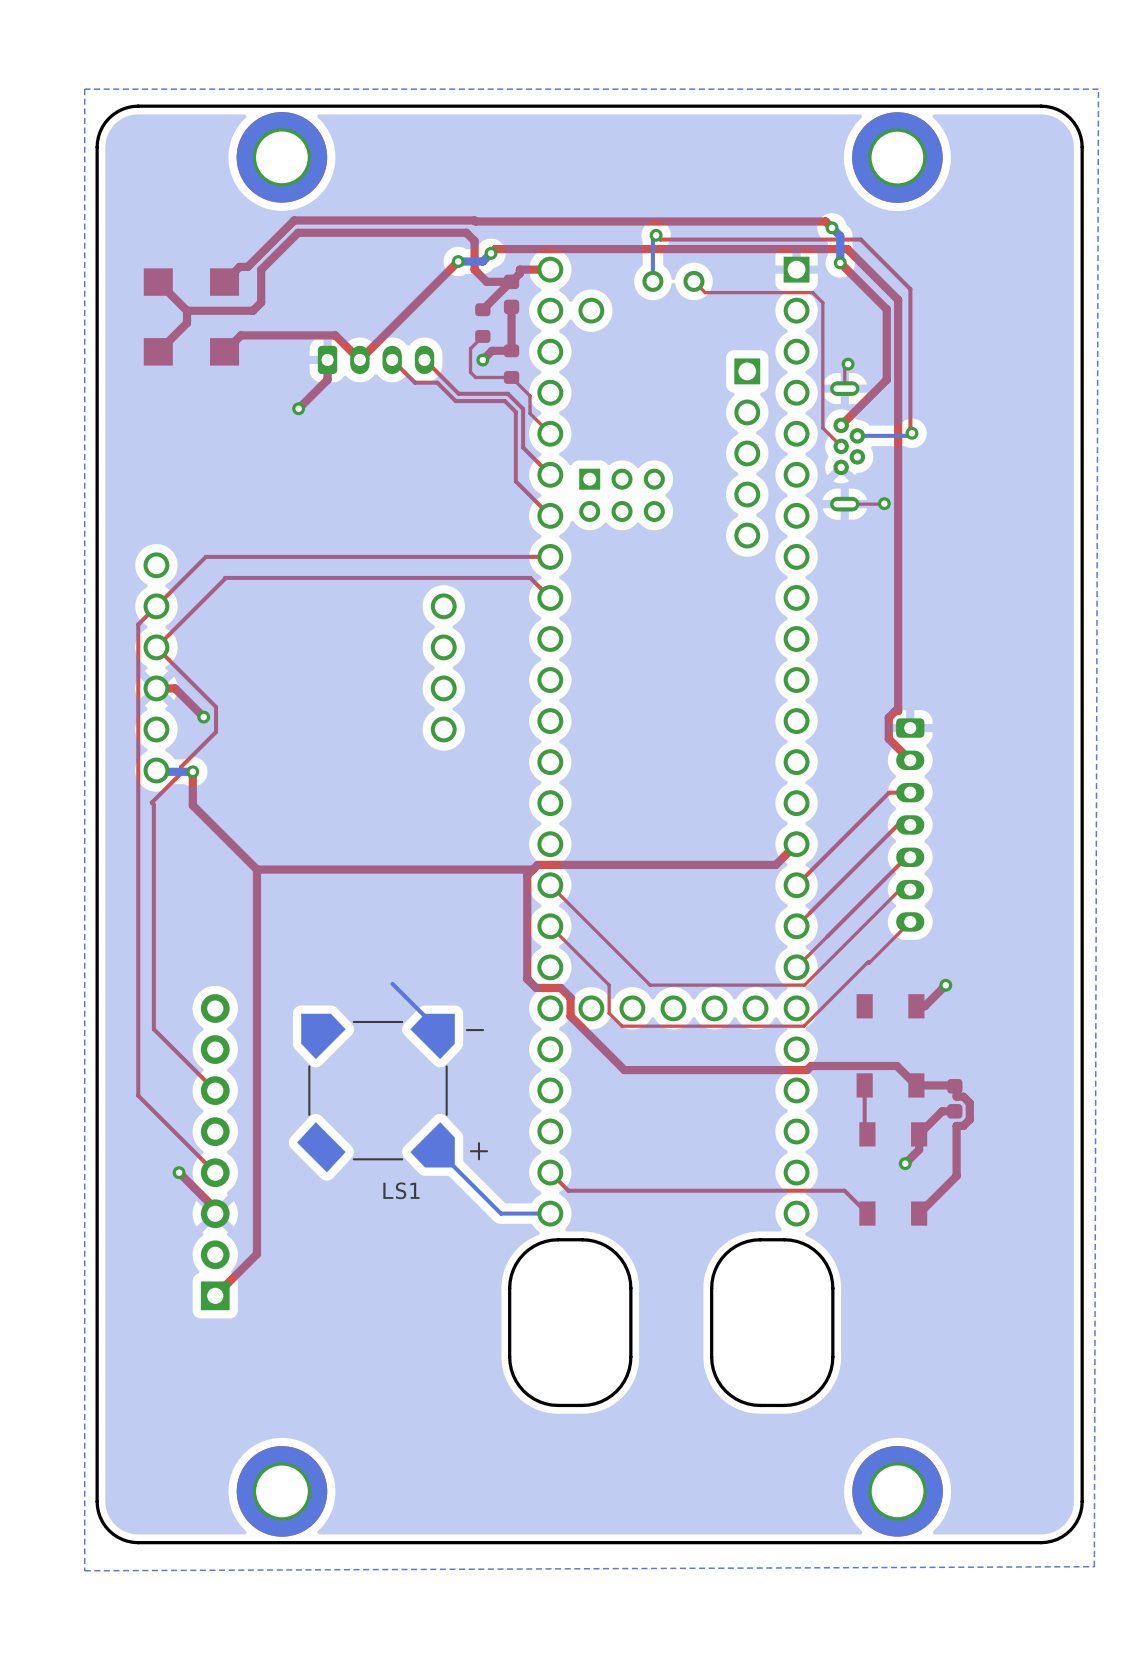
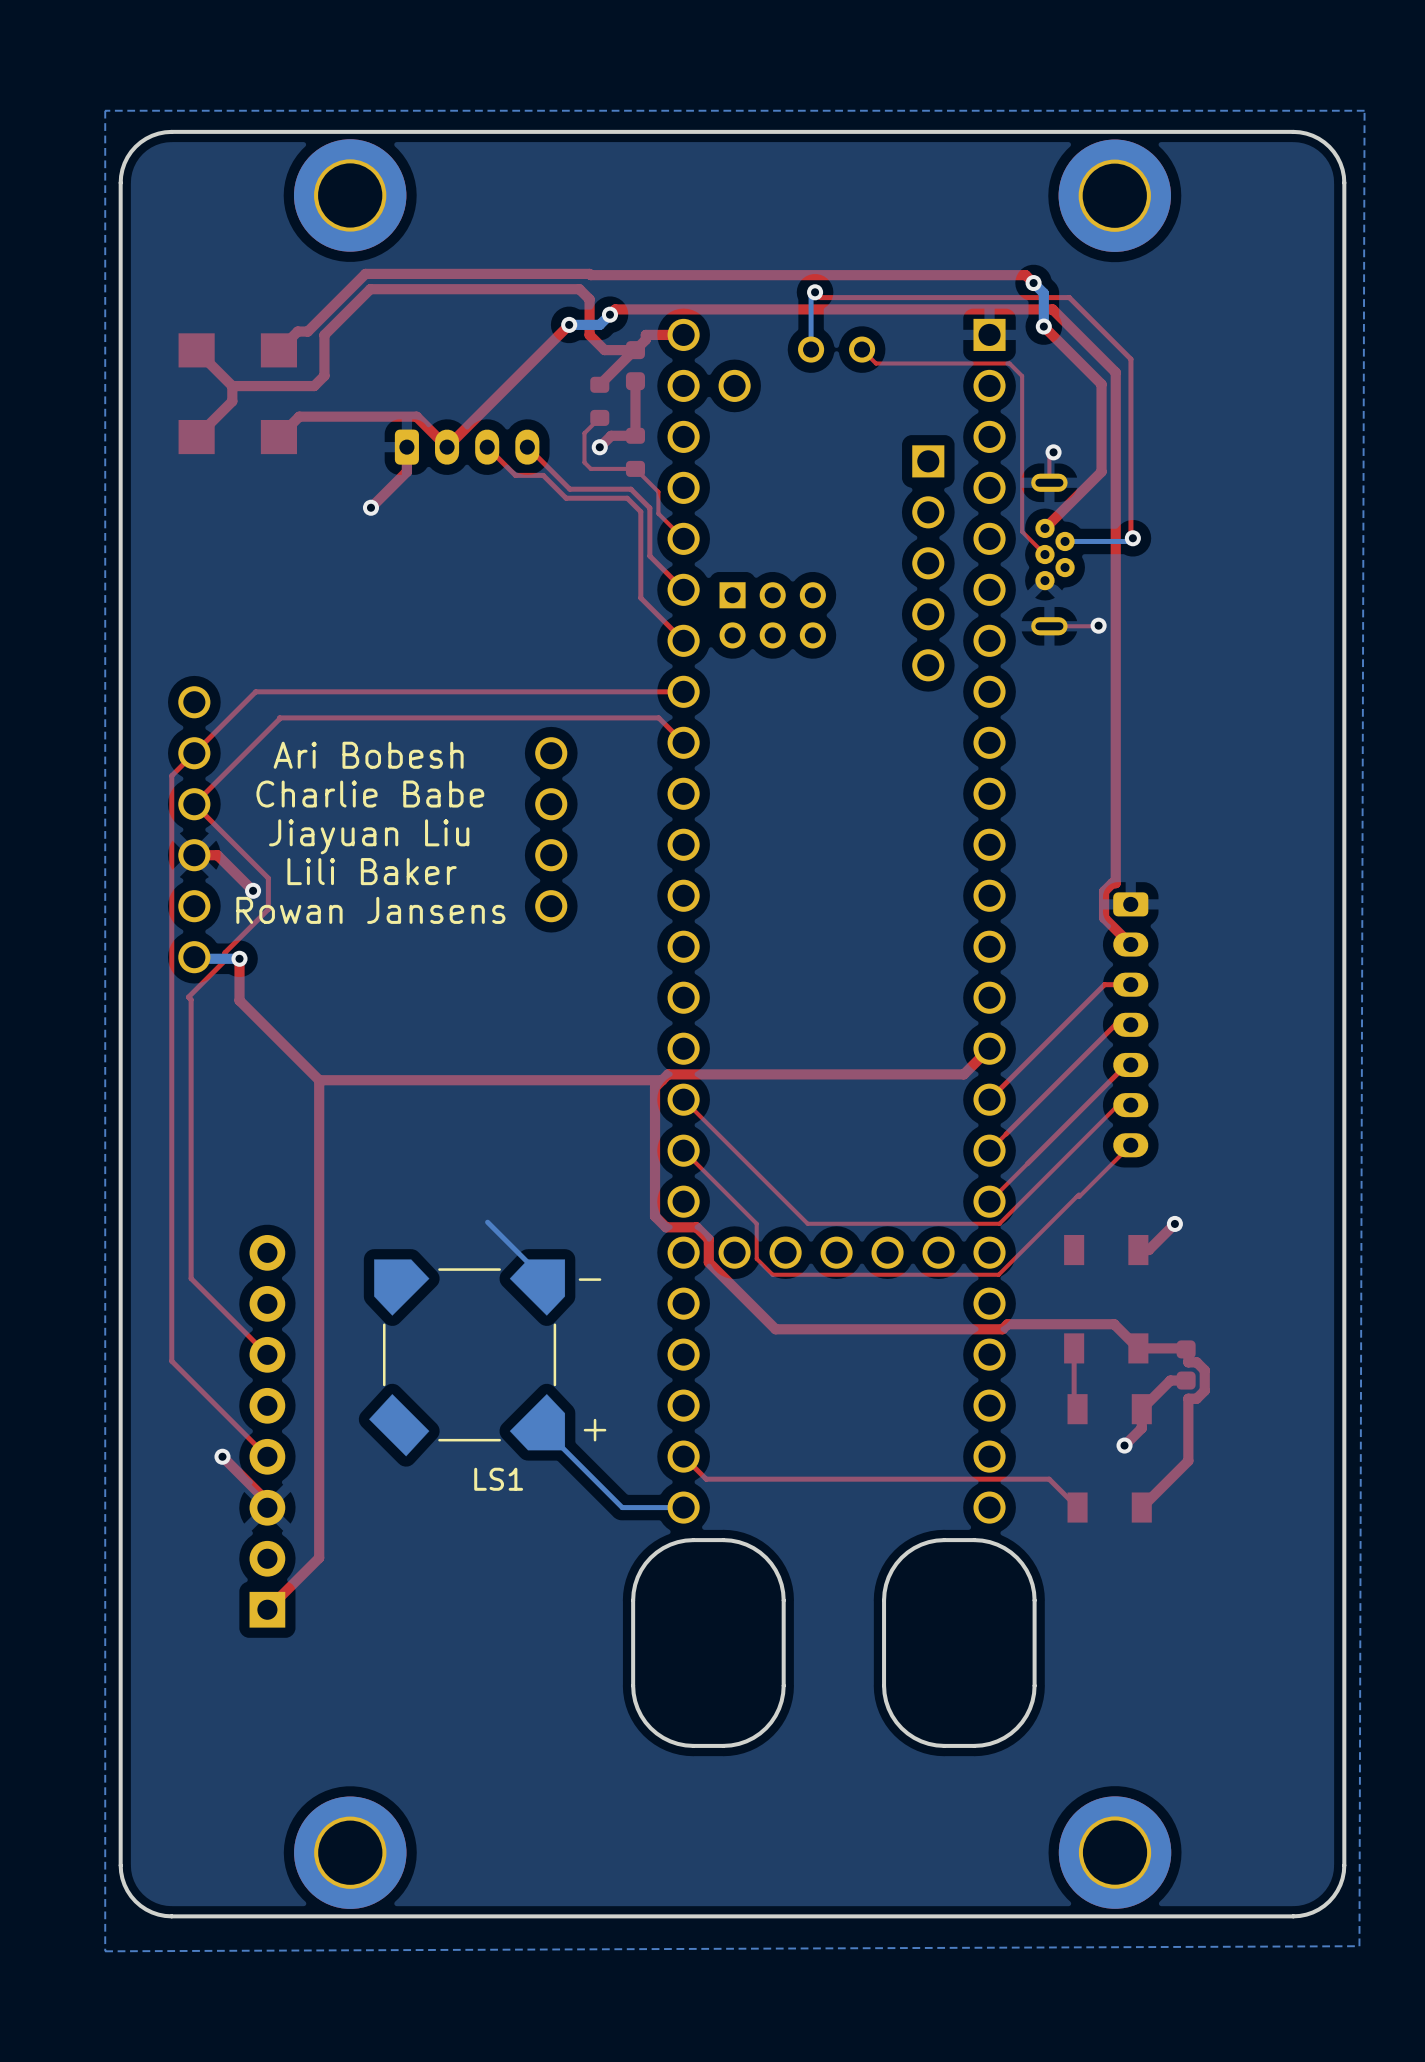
text: none -> Ari Bobesh (368, 755)
text: none -> Charlie Babe (370, 794)
text: none -> Jiayuan Liu (369, 836)
text: none -> Lili Baker (372, 871)
text: none -> Rowan Jansens (370, 910)

